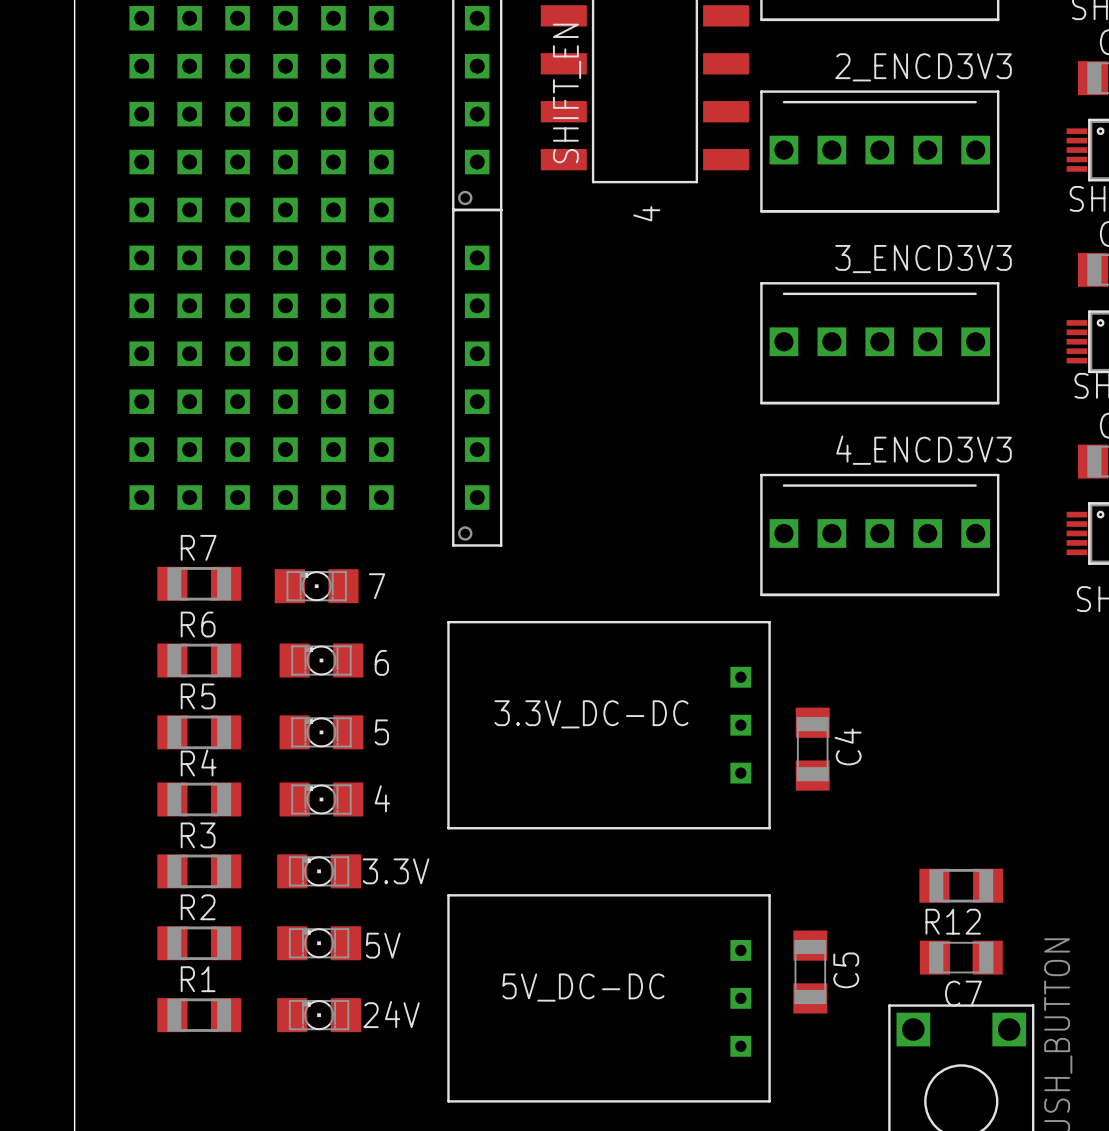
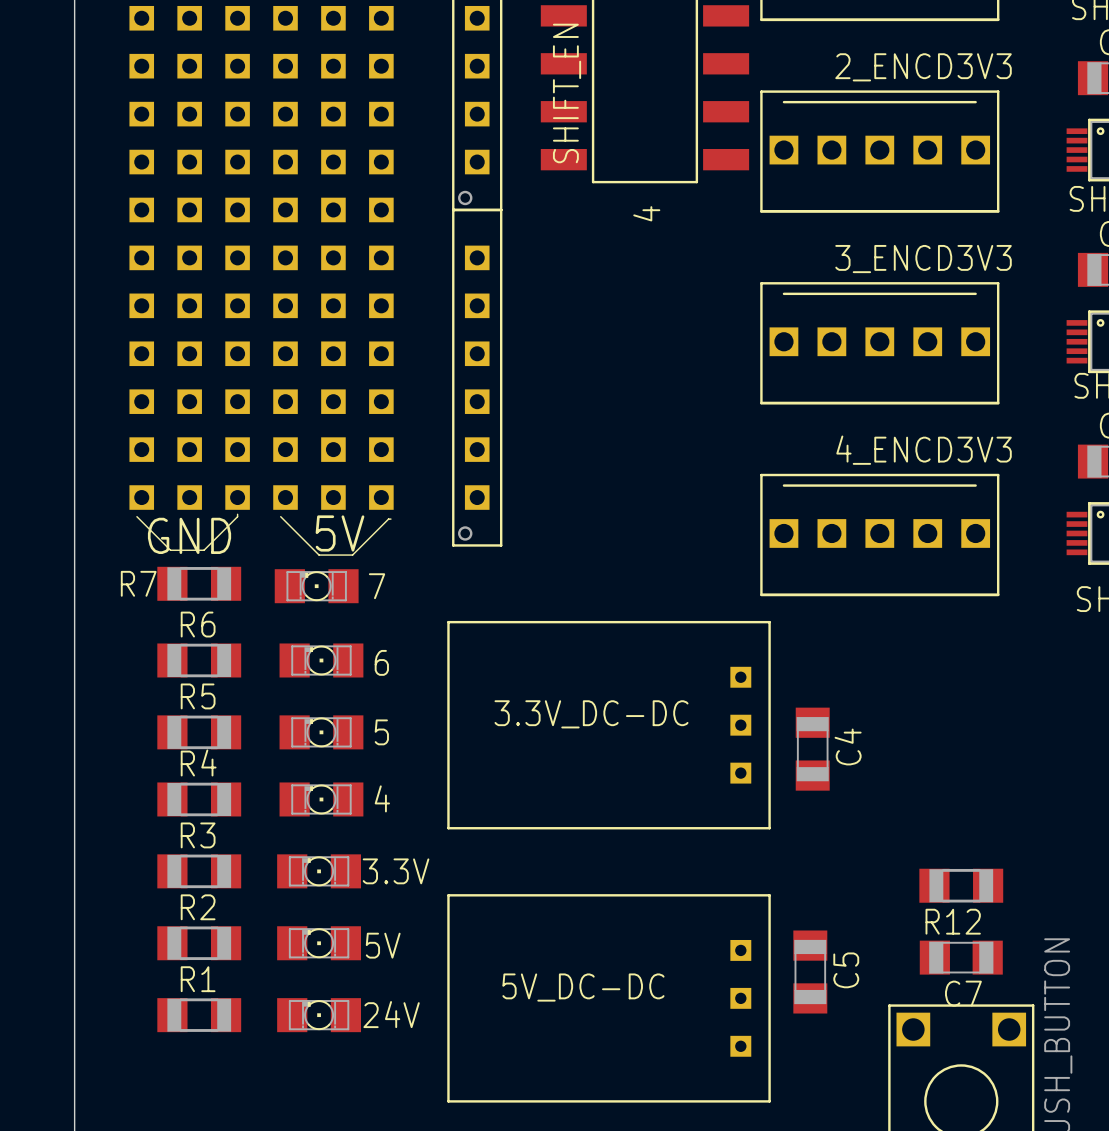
line: none -> (237, 514) (237, 516) (204, 550) (170, 550) (136, 516)
line: none -> (280, 516) (319, 555) (352, 555) (388, 519) (390, 519)
text: none -> 5V (340, 533)
text: none -> GND (189, 535)
R7 name position: R7 (198, 547) -> R7 (138, 583)

